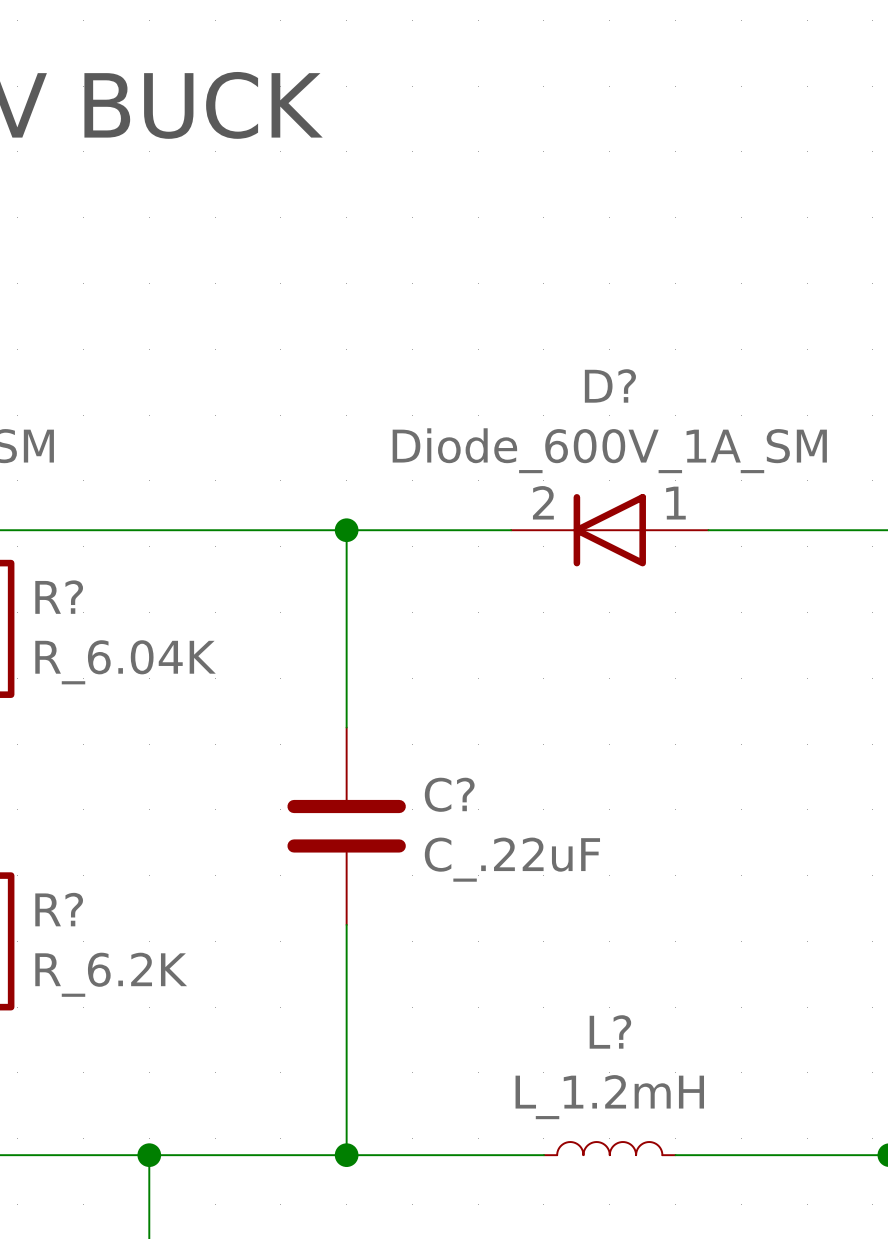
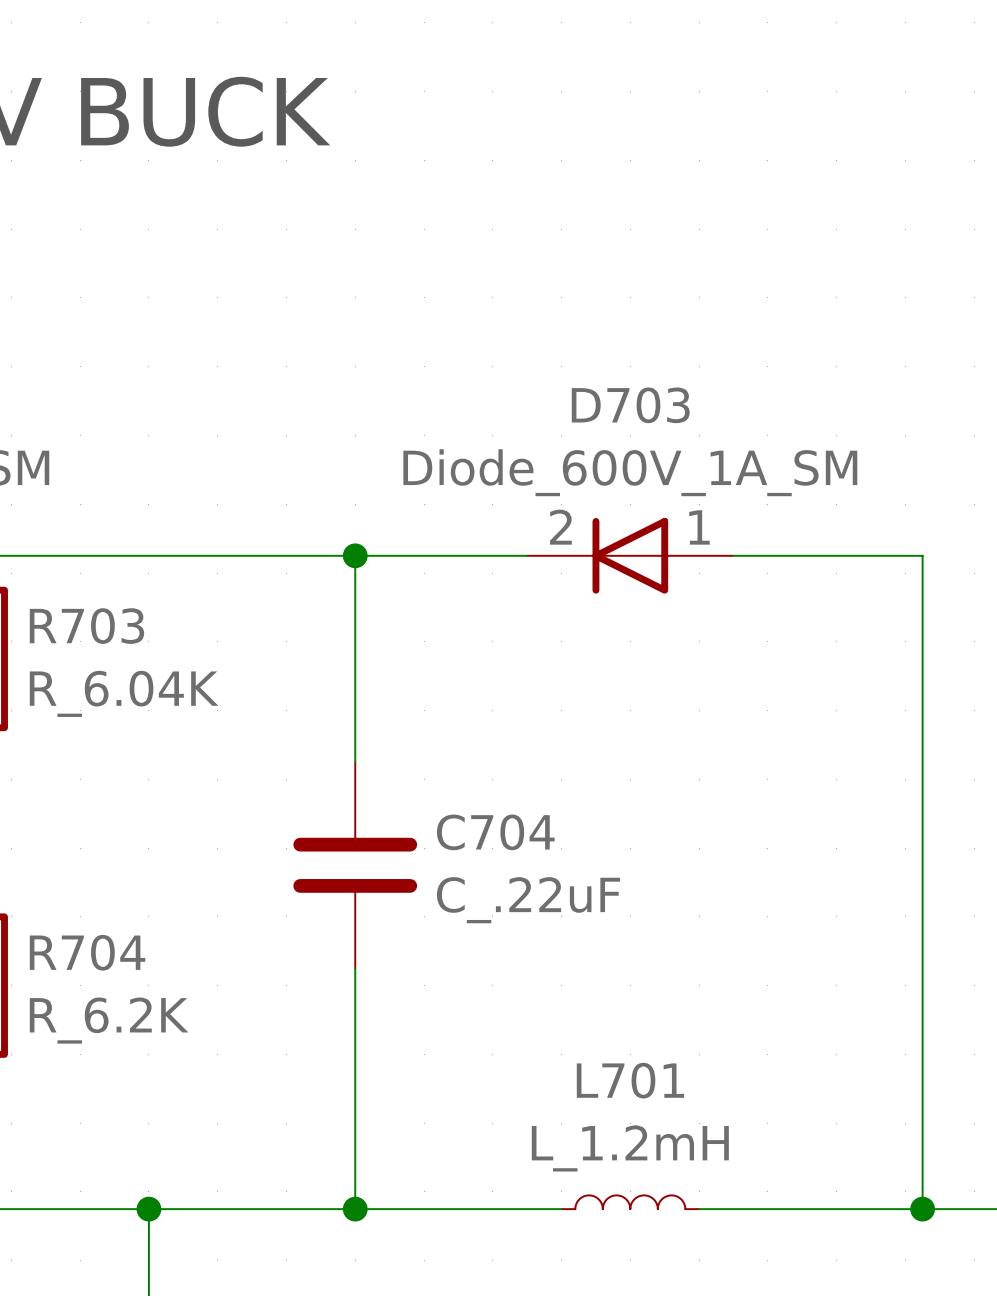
D? name: D? (610, 385) -> D703 (630, 405)
R? name: R? (59, 597) -> R703 (86, 626)
C? name: C? (449, 794) -> C704 (495, 832)
R? name: R? (59, 909) -> R704 (87, 952)
L? name: L? (610, 1031) -> L701 (630, 1080)

